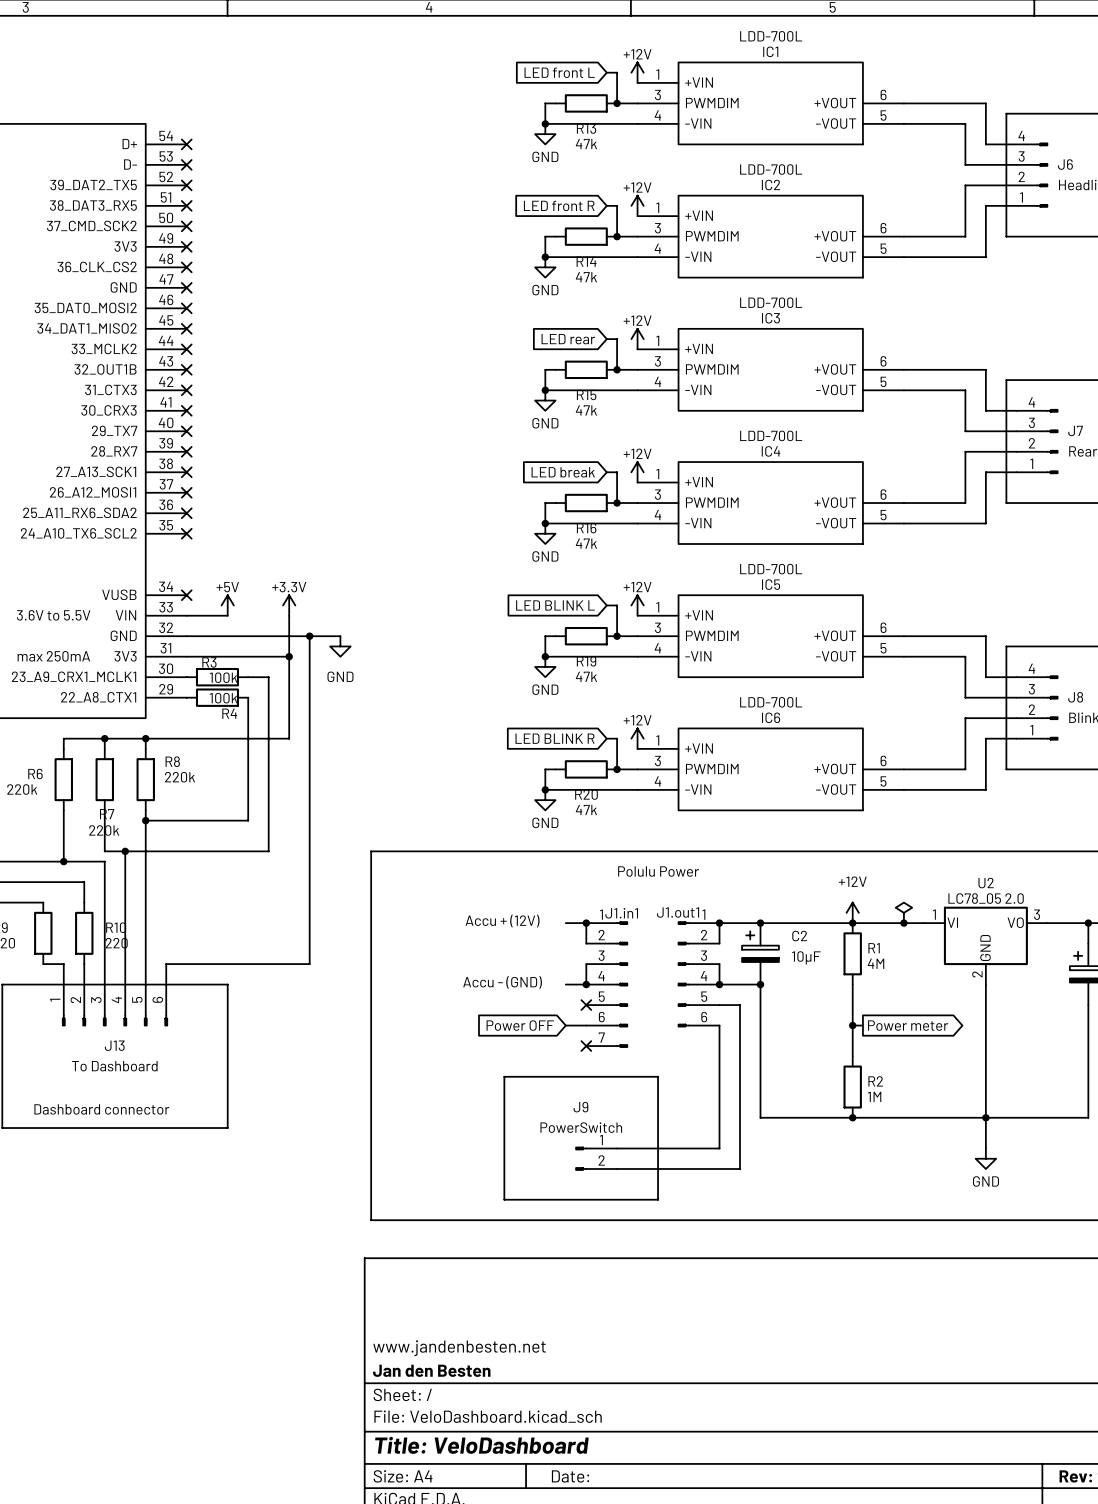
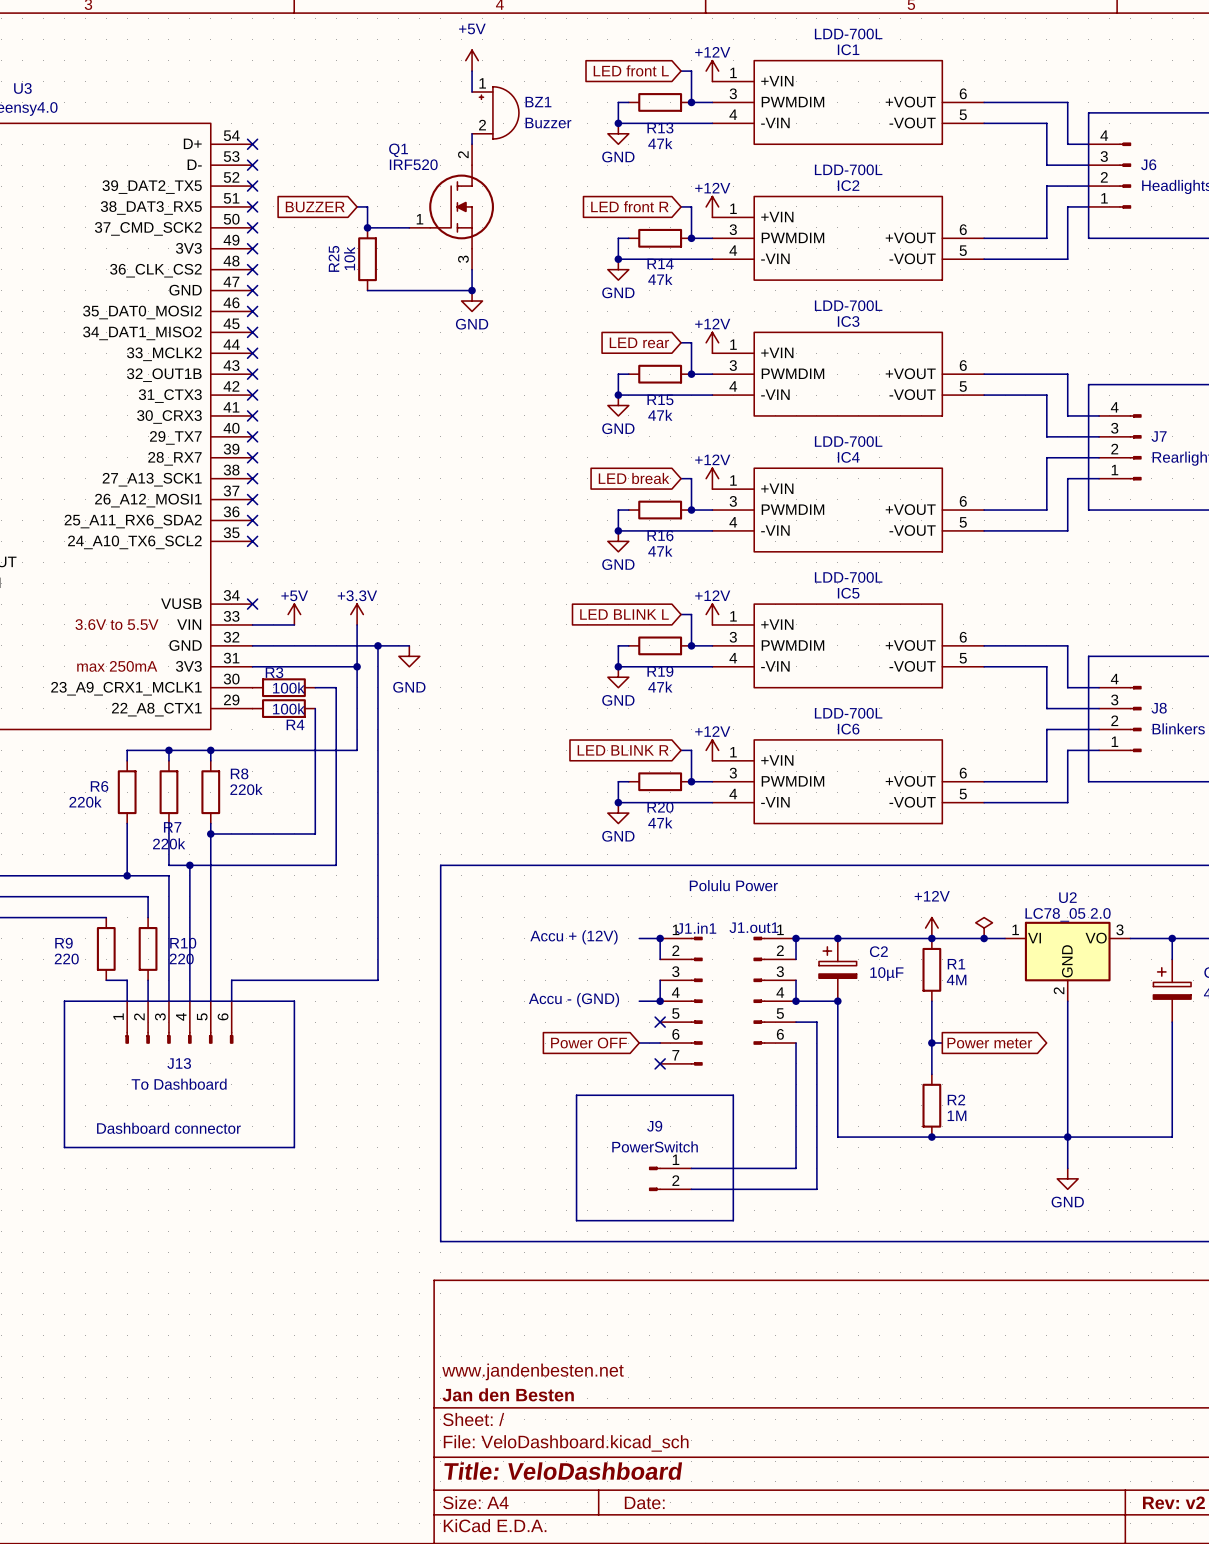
power symbol: none -> +5V (472, 60)
wire: none -> (472, 71) (472, 92)
BZ1: none -> Buzzer (495, 112)
wire: none -> (472, 133) (472, 144)
global label: none -> BUZZER (315, 207)
wire: none -> (357, 206) (367, 206) (367, 227) (409, 227)
Q1: none -> IRF520 (451, 206)
junction: none -> (367, 227)
R25: none -> 10k (367, 259)
wire: none -> (472, 269) (472, 290) (367, 290)
junction: none -> (472, 290)
power symbol: none -> GND (472, 301)

